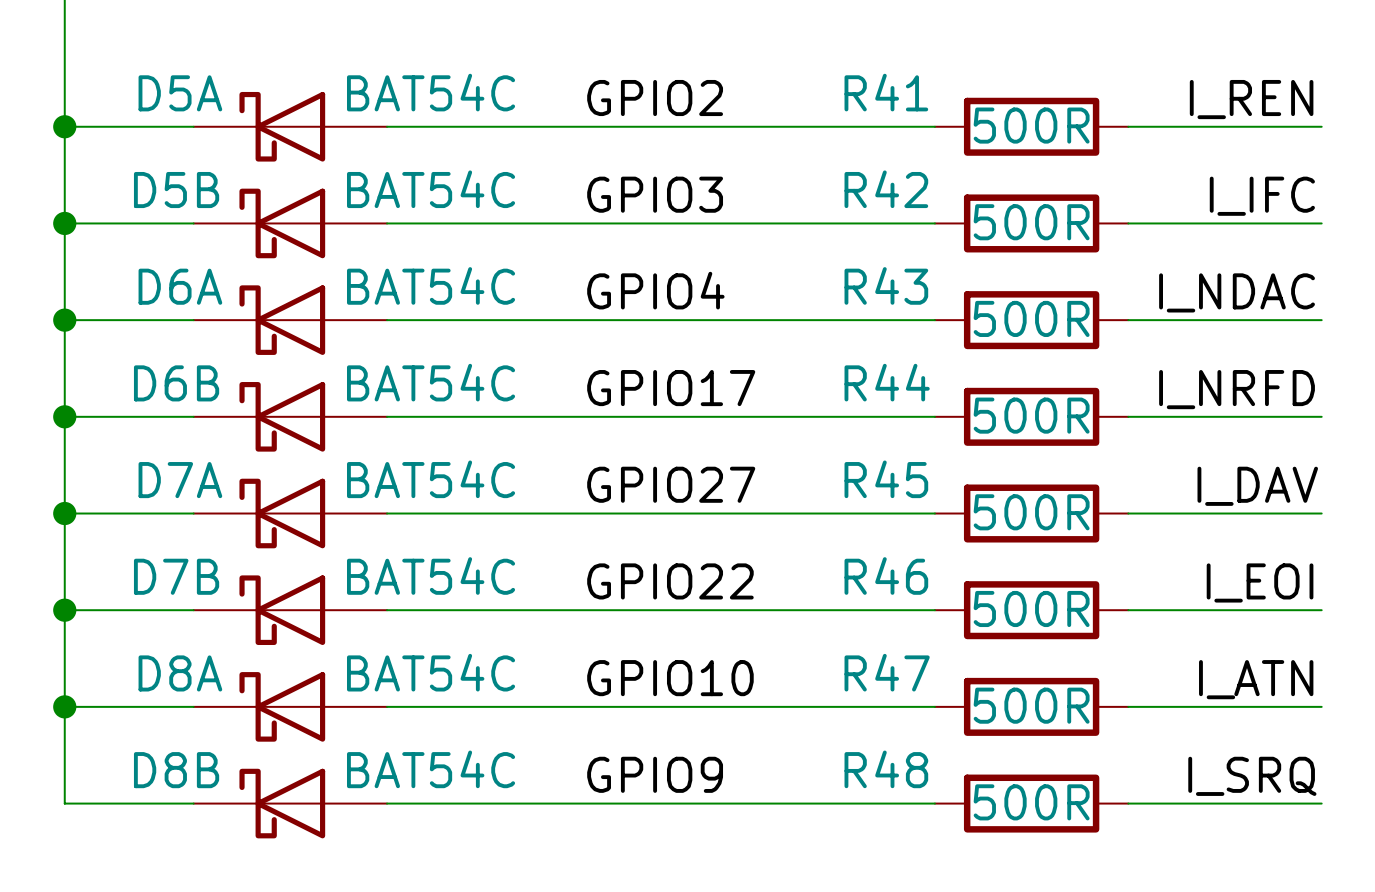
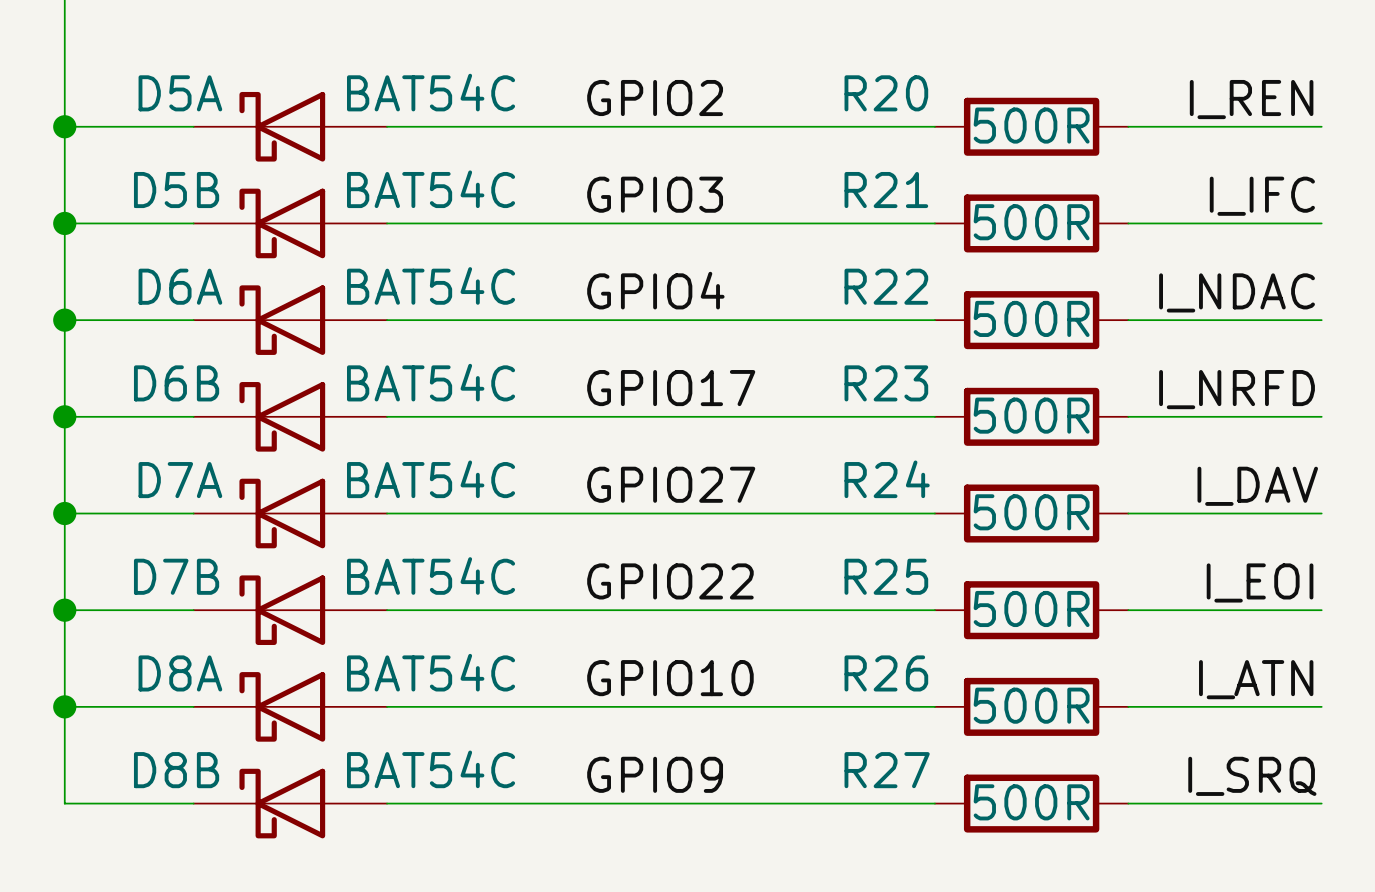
R41 name: R41 (886, 92) -> R20 (886, 93)
R42 name: R42 (886, 189) -> R21 (886, 190)
R43 name: R43 (886, 285) -> R22 (886, 286)
R44 name: R44 (887, 382) -> R23 (886, 383)
R45 name: R45 (886, 479) -> R24 (887, 479)
R46 name: R46 (886, 575) -> R25 (886, 576)
R47 name: R47 (887, 672) -> R26 (886, 673)
R48 name: R48 (886, 769) -> R27 (887, 770)

